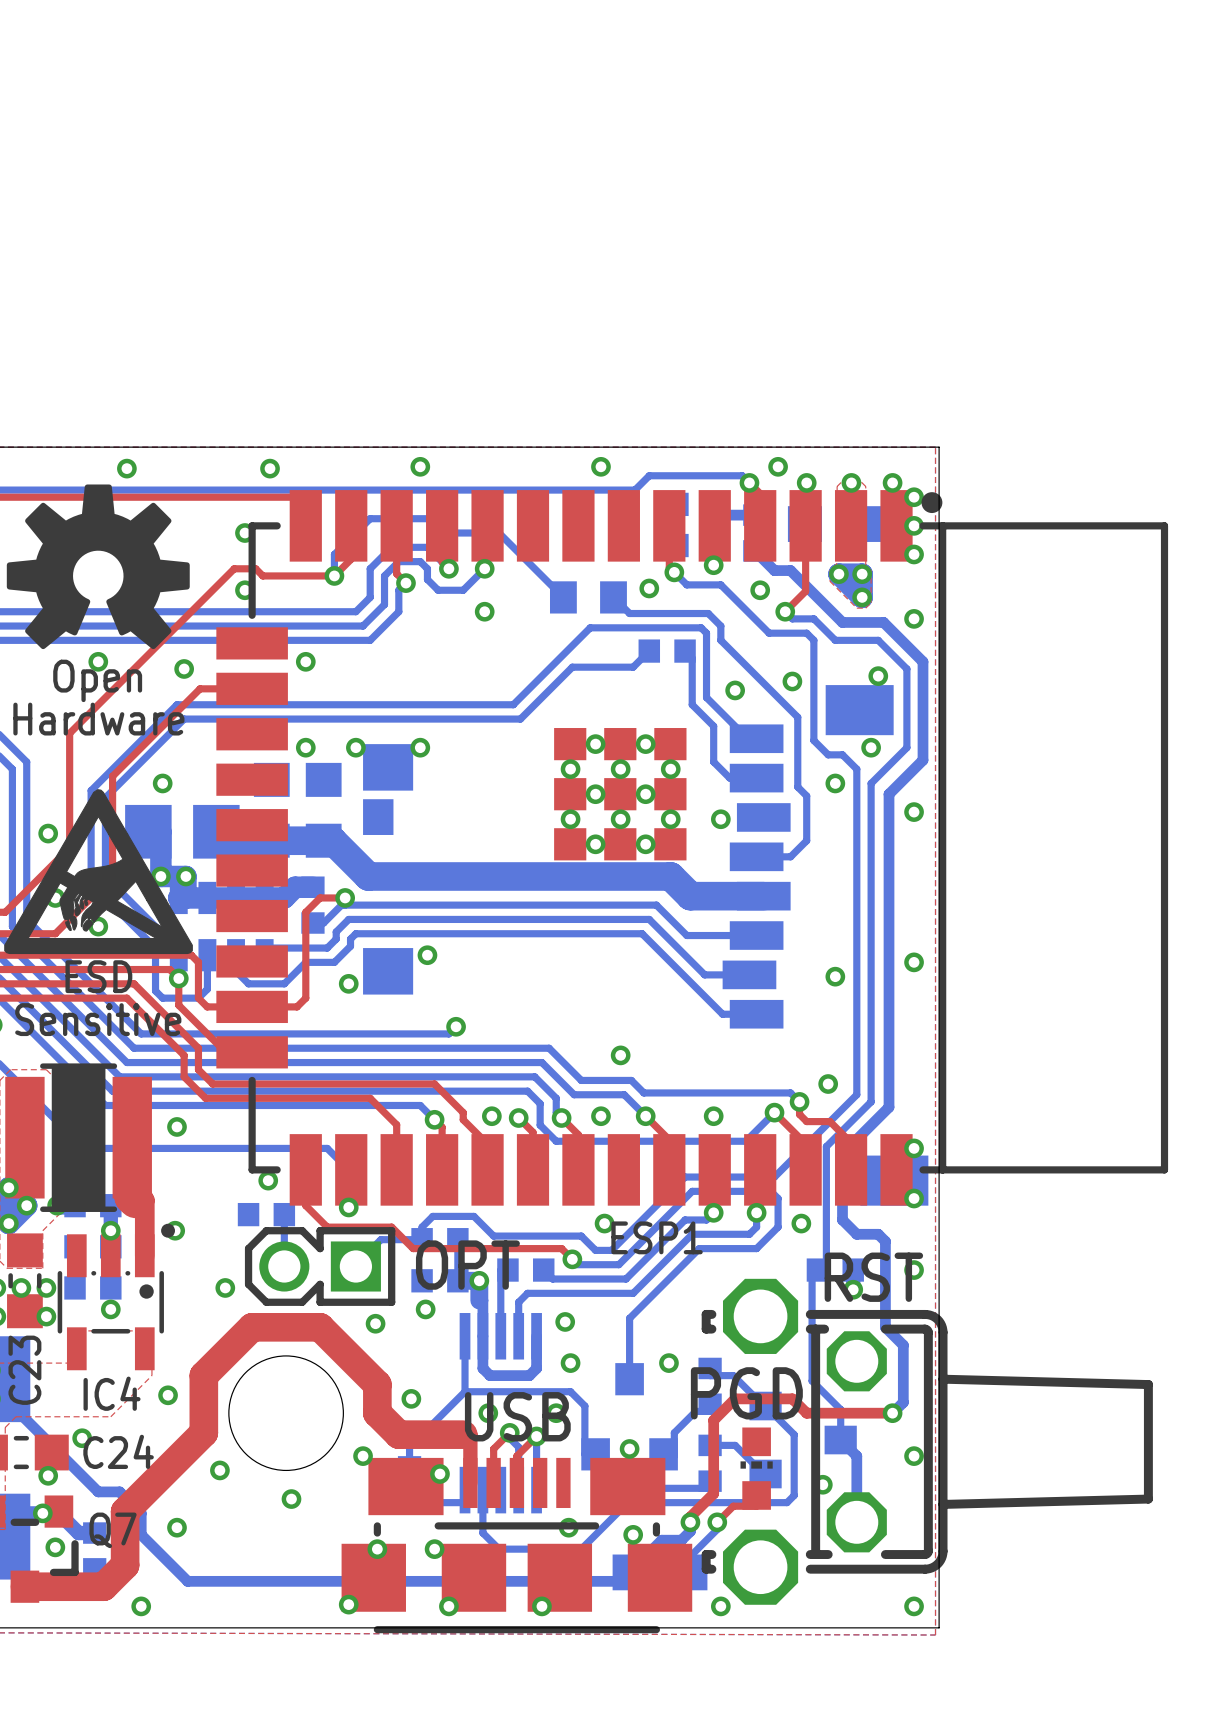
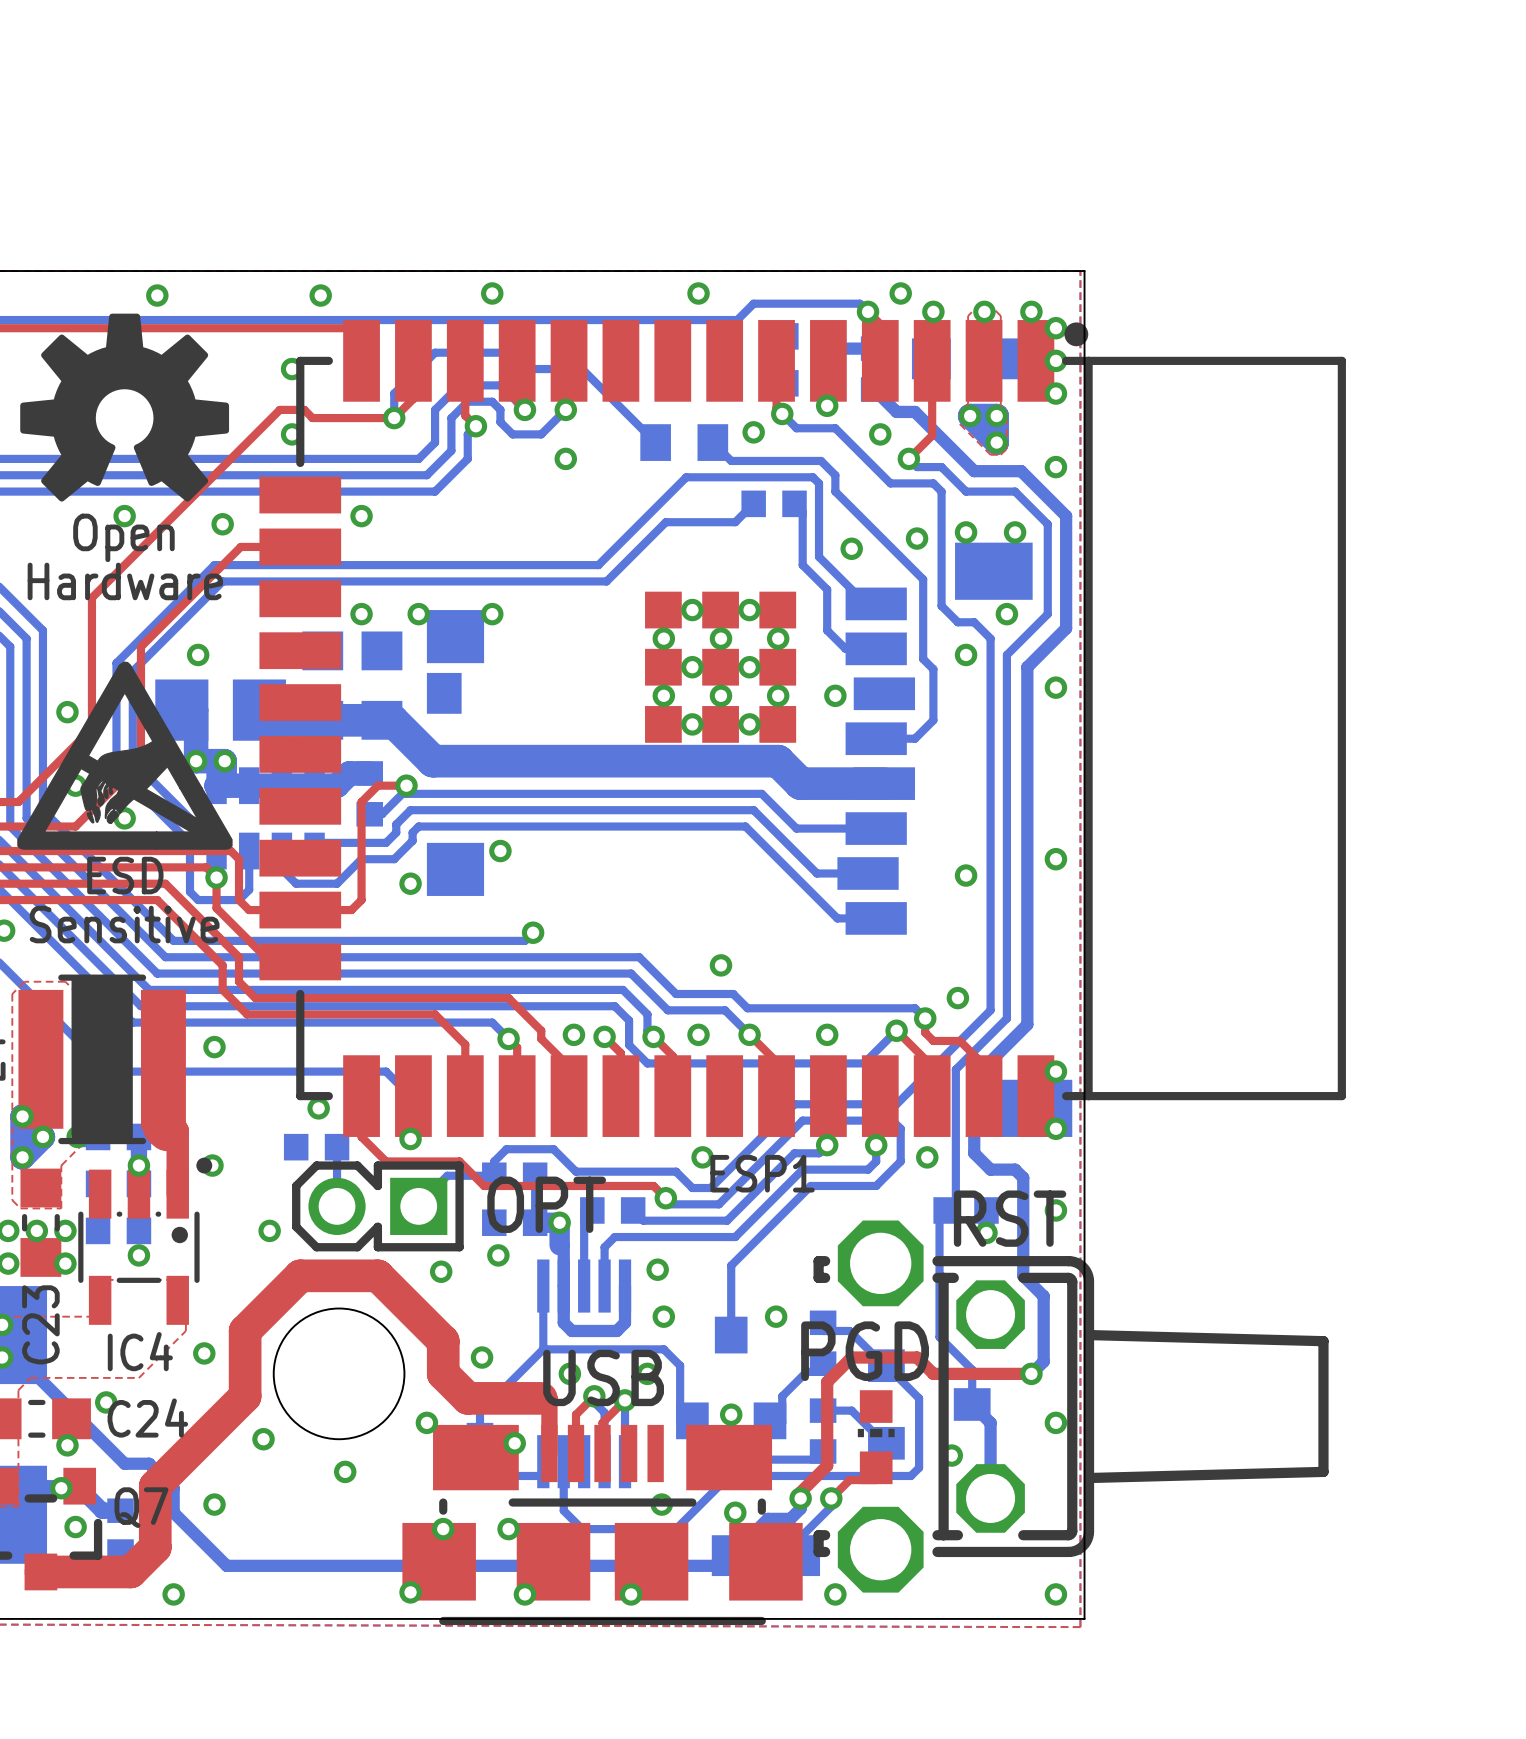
via: none -> (966, 532)

